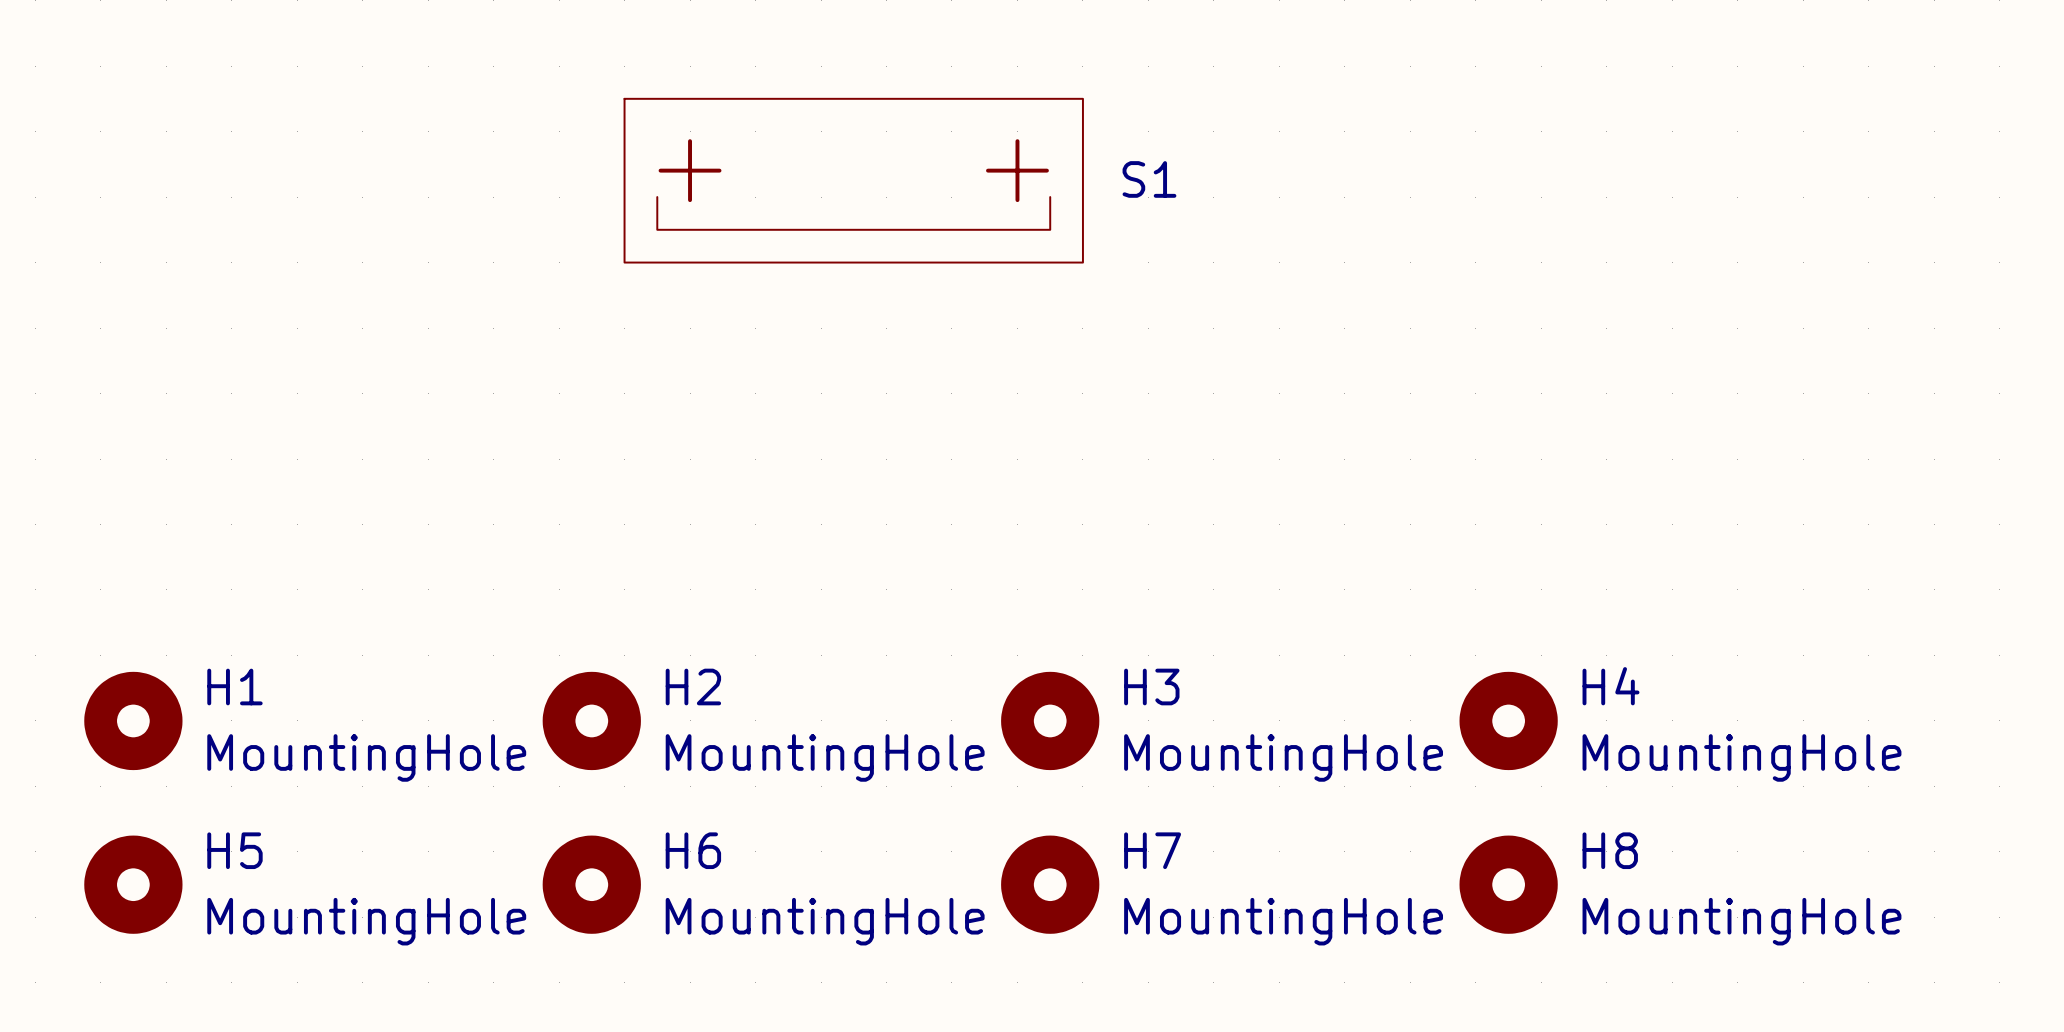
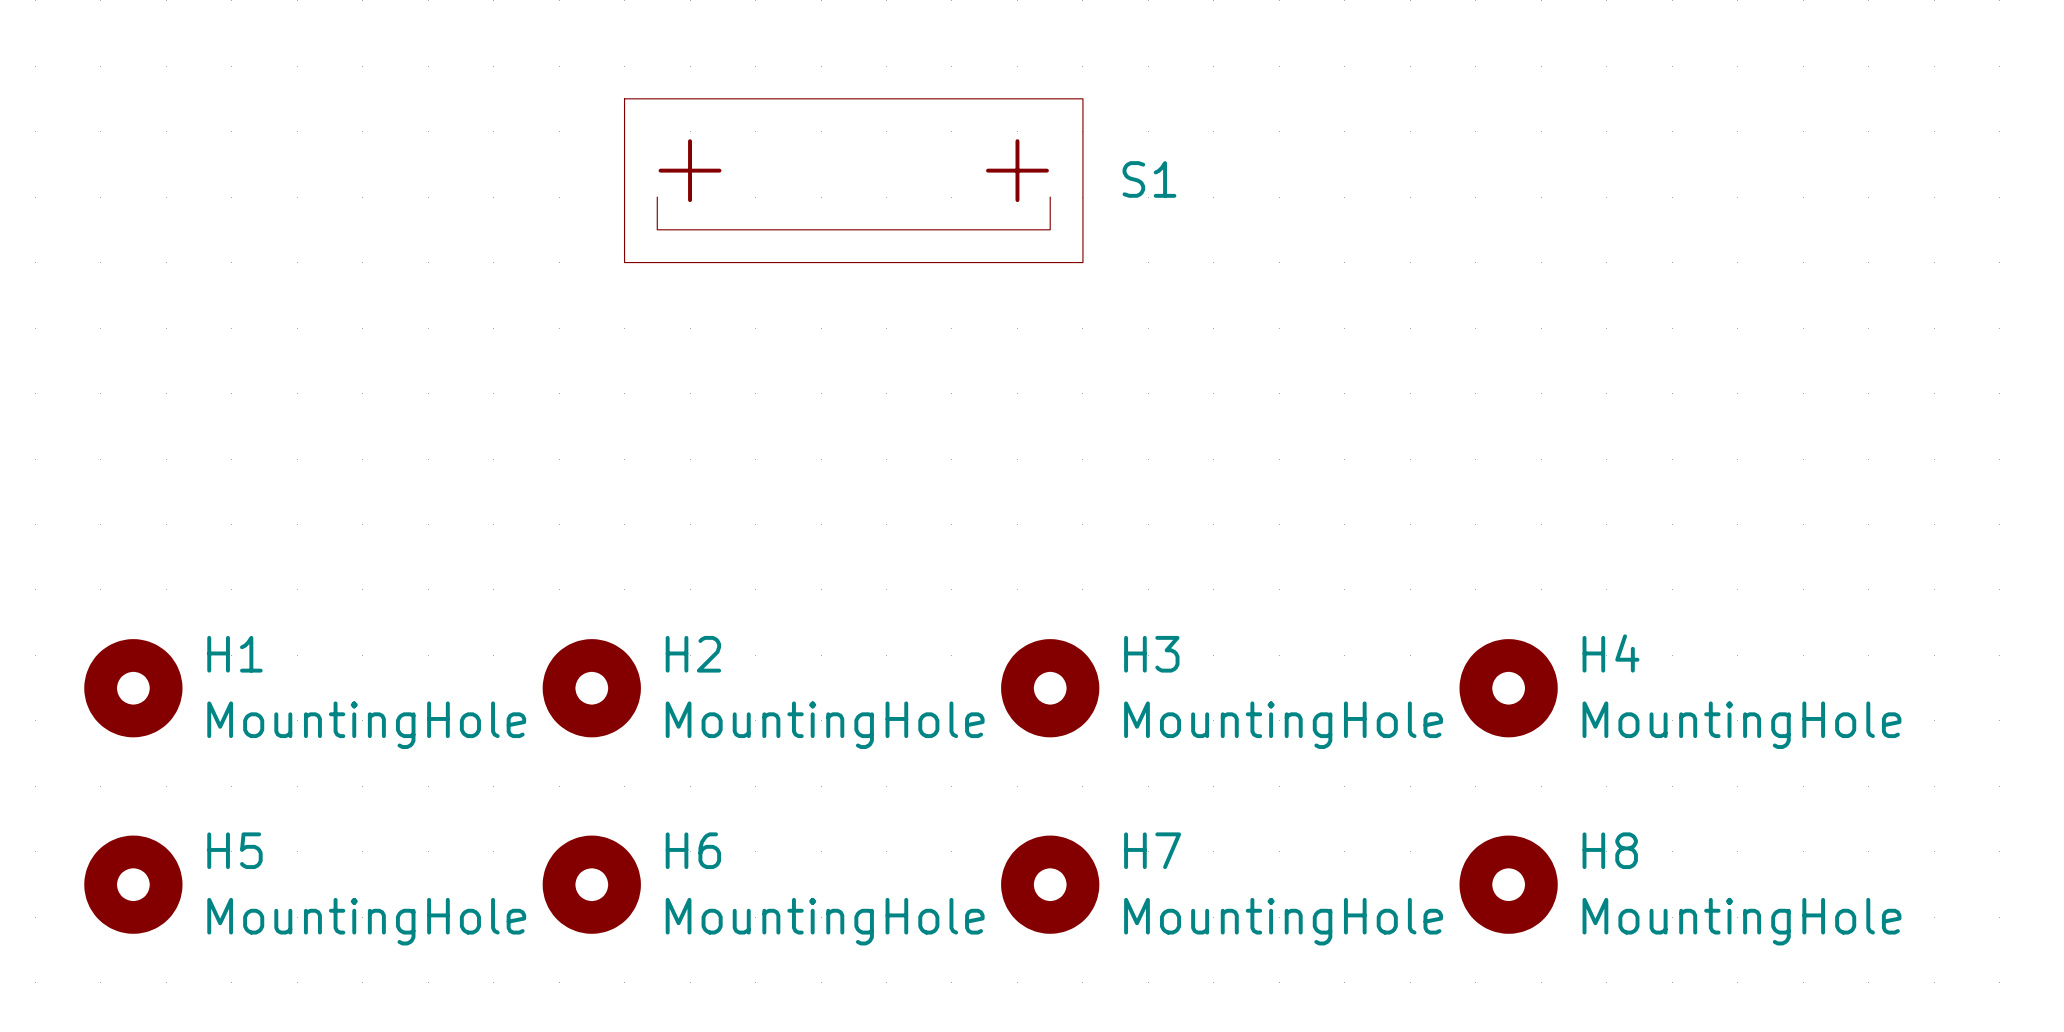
H1 position: (133, 720) -> (133, 688)
H2 position: (591, 720) -> (591, 688)
H3 position: (1050, 720) -> (1050, 688)
H4 position: (1508, 720) -> (1508, 688)

